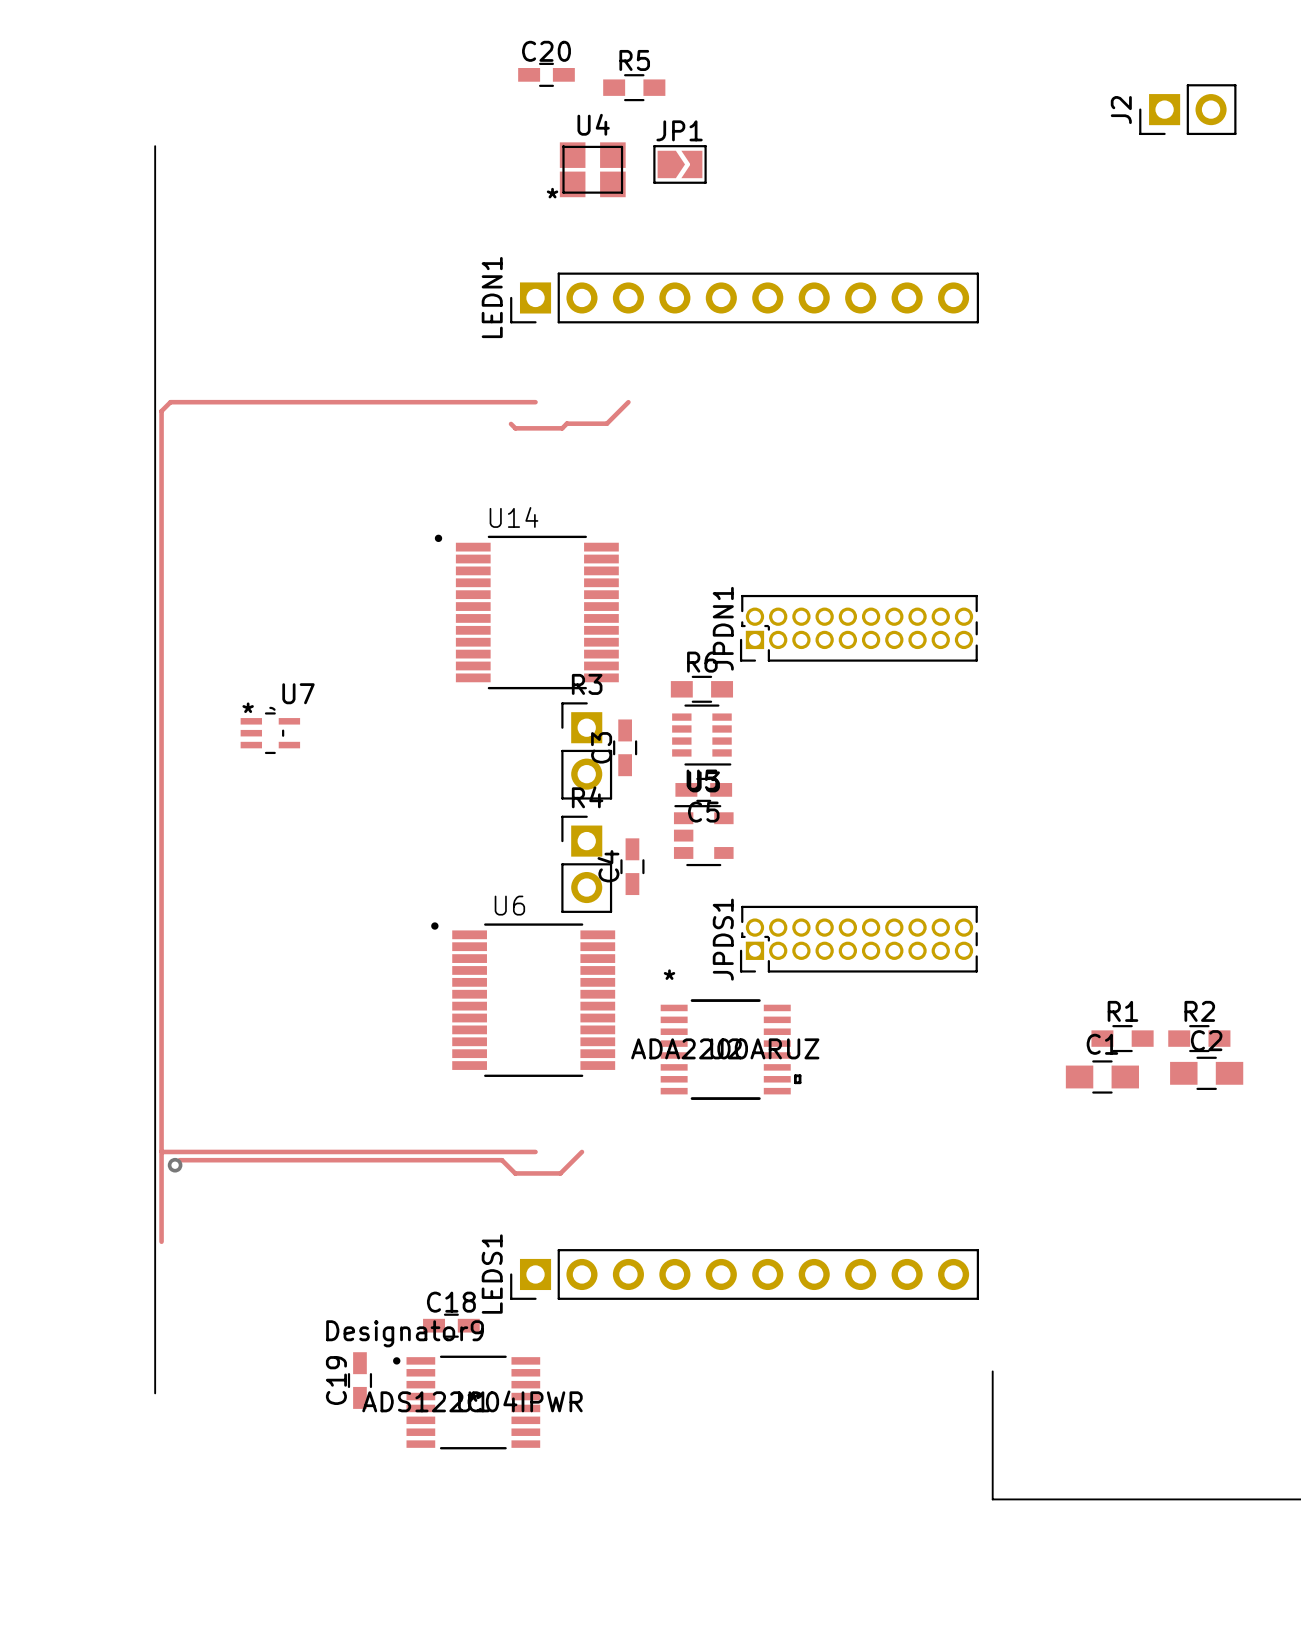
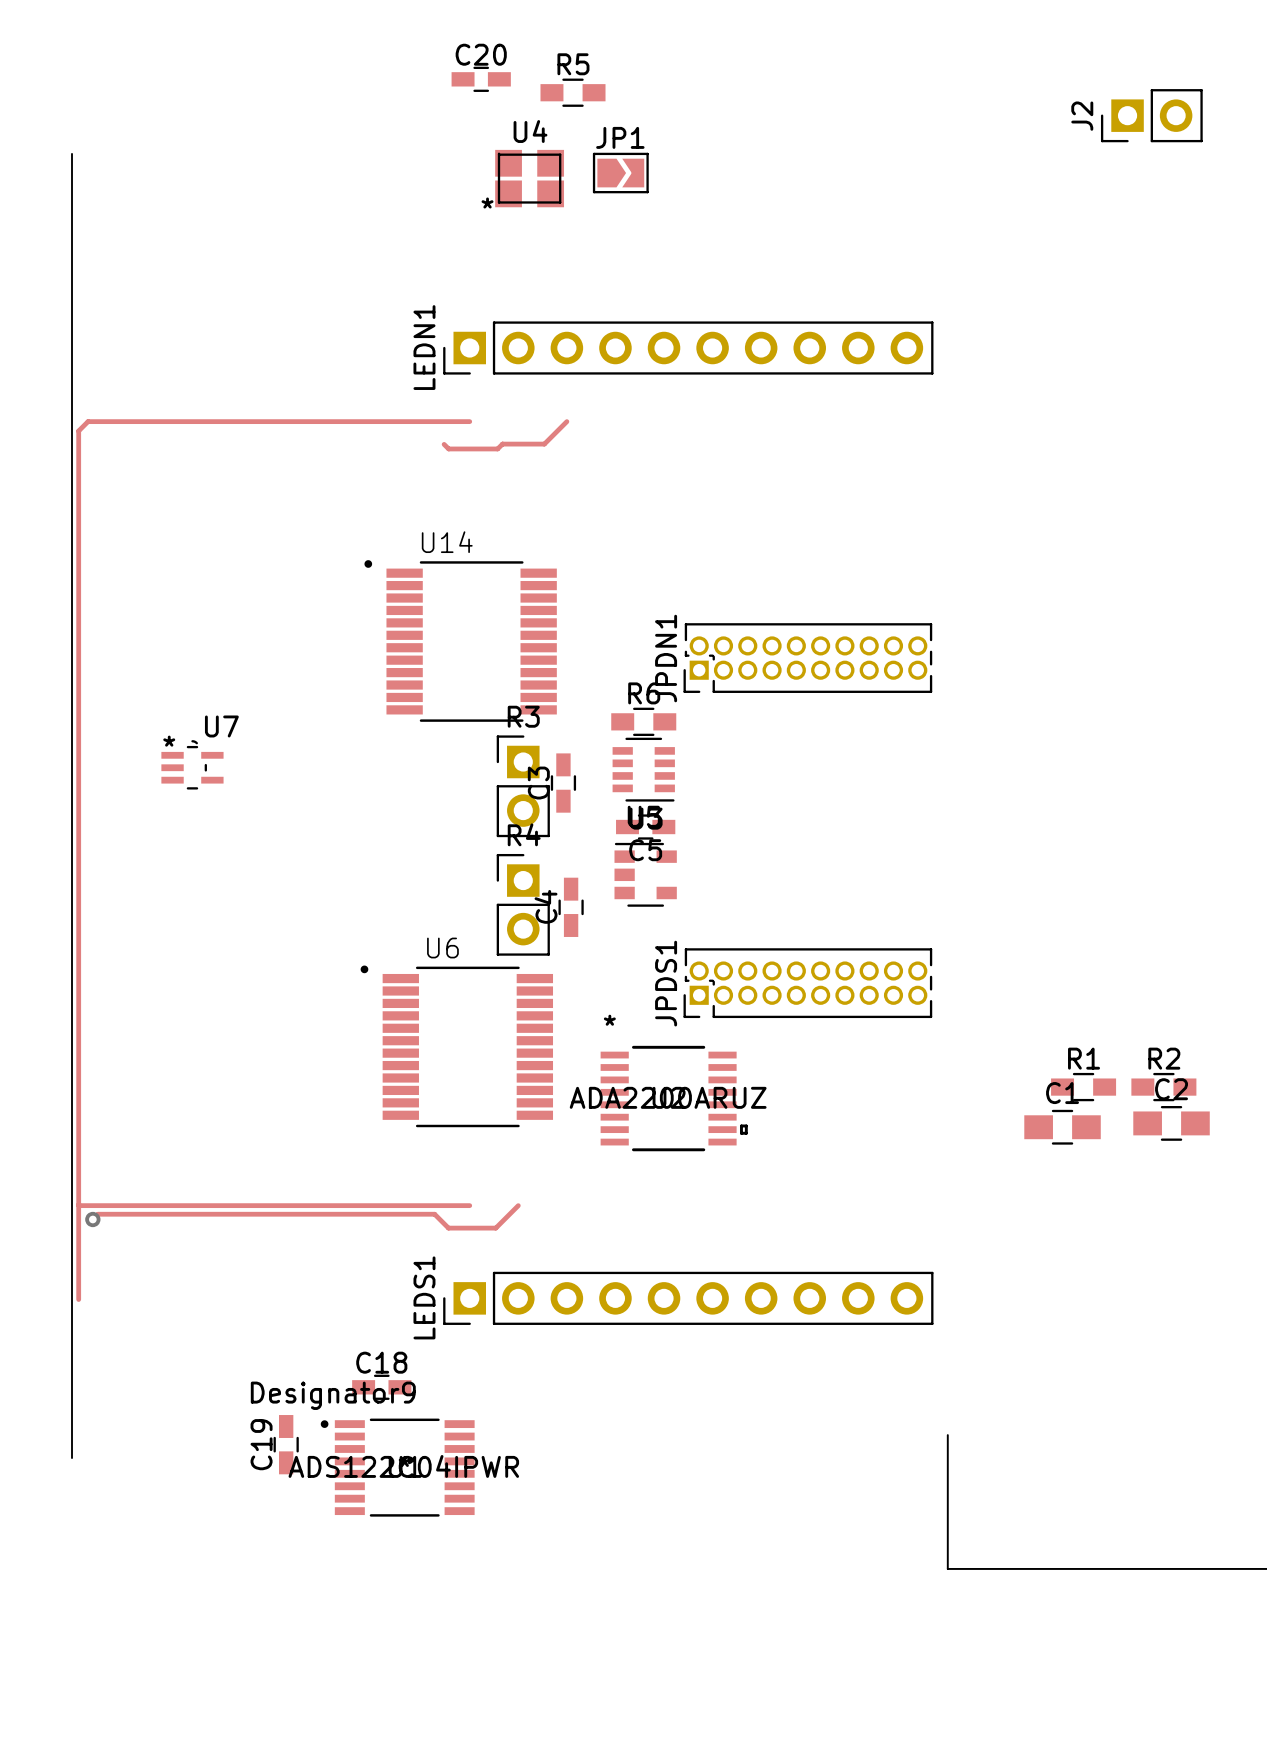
LEDN1 position: (744, 297) -> (688, 348)
LEDS1 position: (744, 1274) -> (688, 1298)

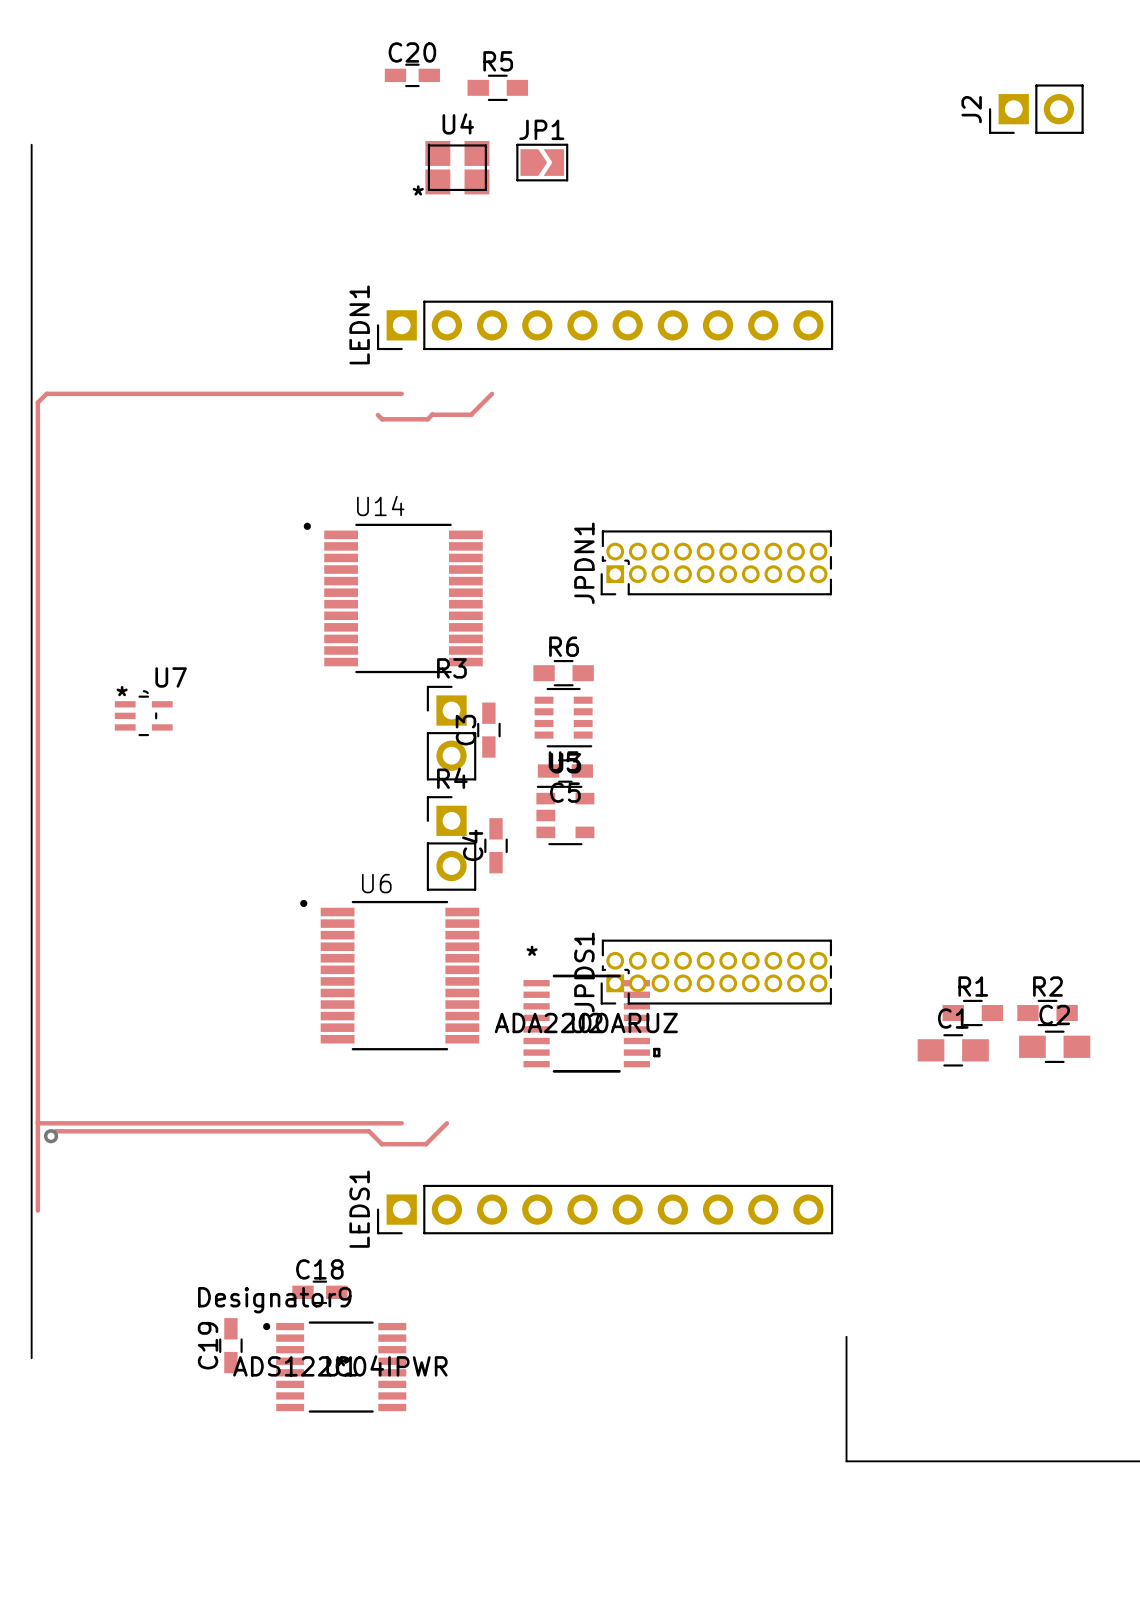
JPDN1 position: (807, 658) -> (716, 562)
JPDS1 position: (807, 983) -> (716, 972)

